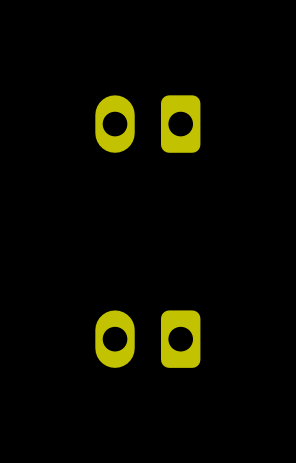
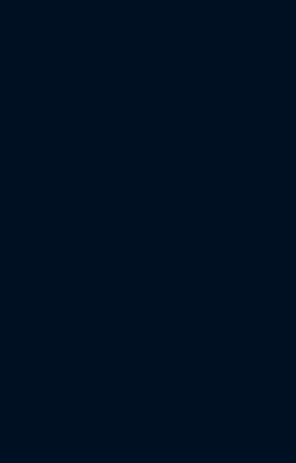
part: (147, 124) -> none
part: (147, 339) -> none

